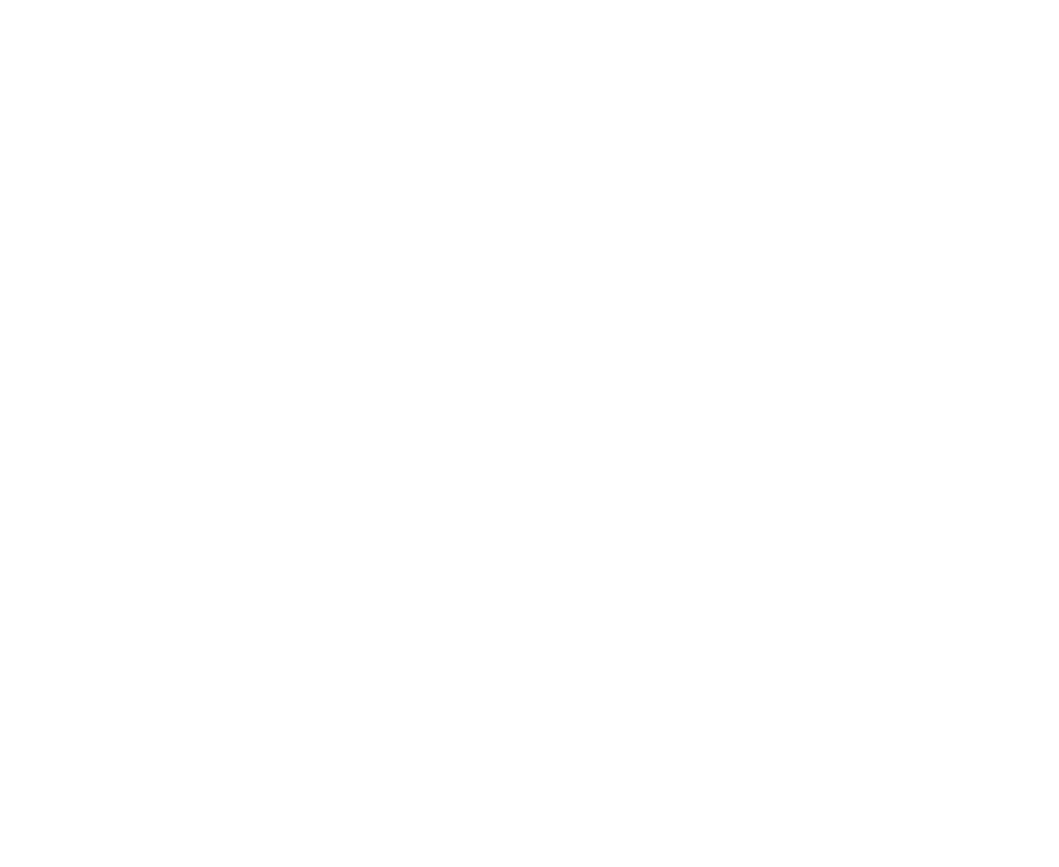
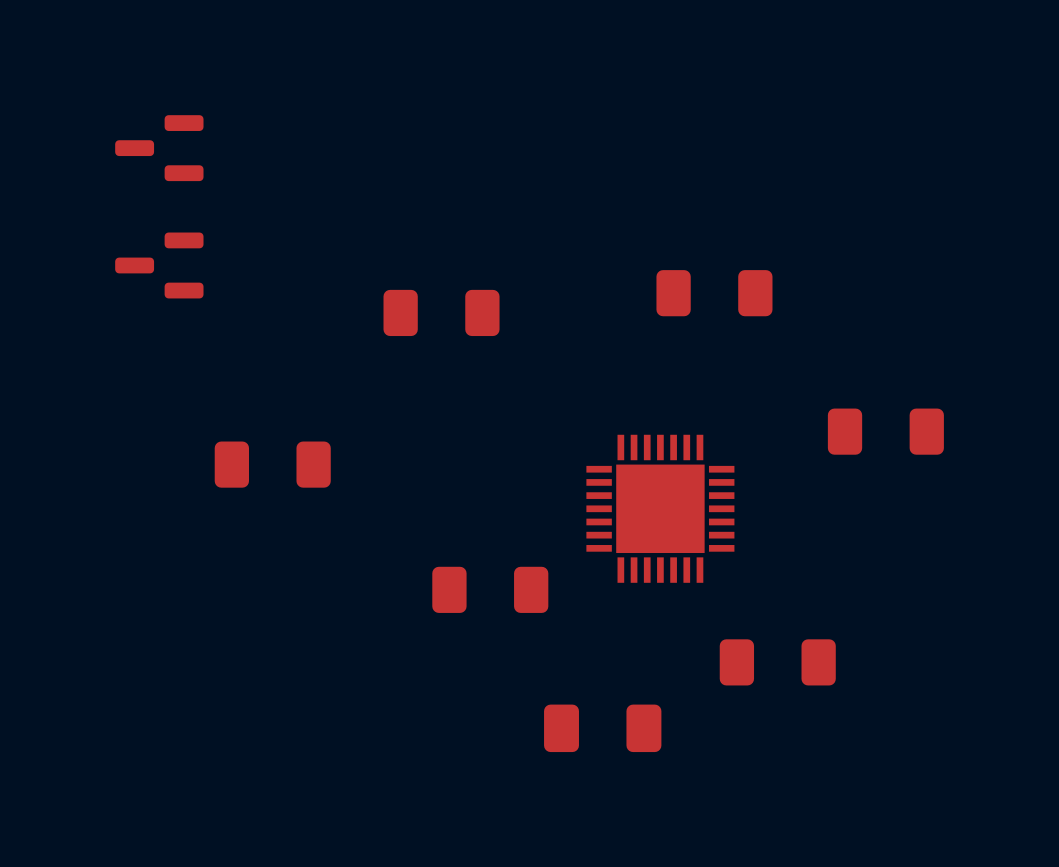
part: none -> (159, 148)
part: none -> (159, 265)
part: none -> (714, 293)
part: none -> (441, 312)
part: none -> (885, 431)
part: none -> (272, 464)
part: none -> (660, 508)
part: none -> (490, 589)
part: none -> (777, 662)
part: none -> (602, 728)

